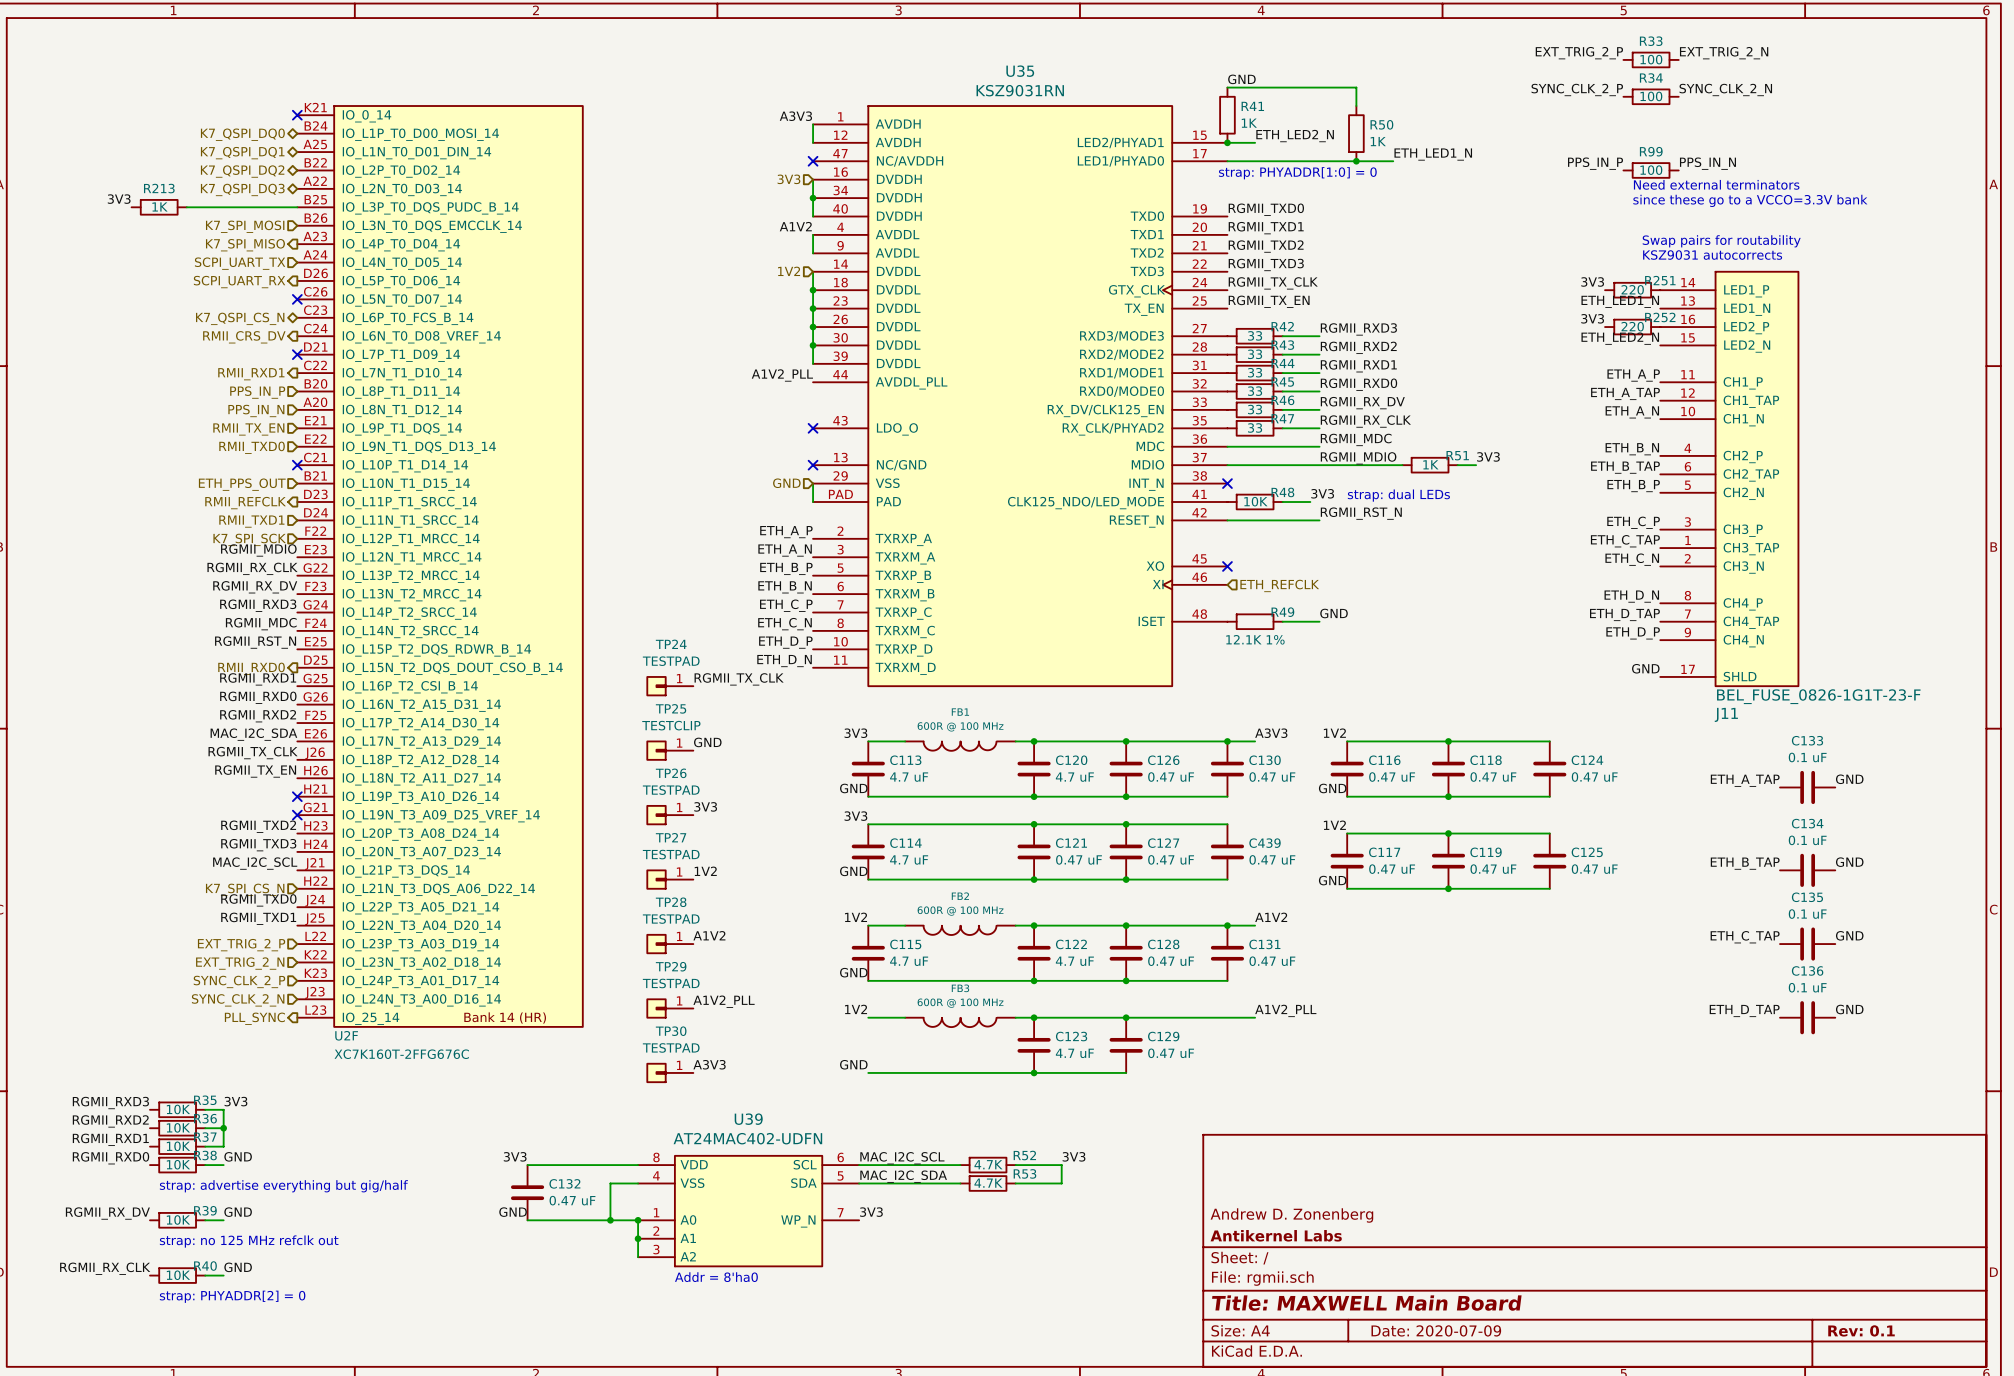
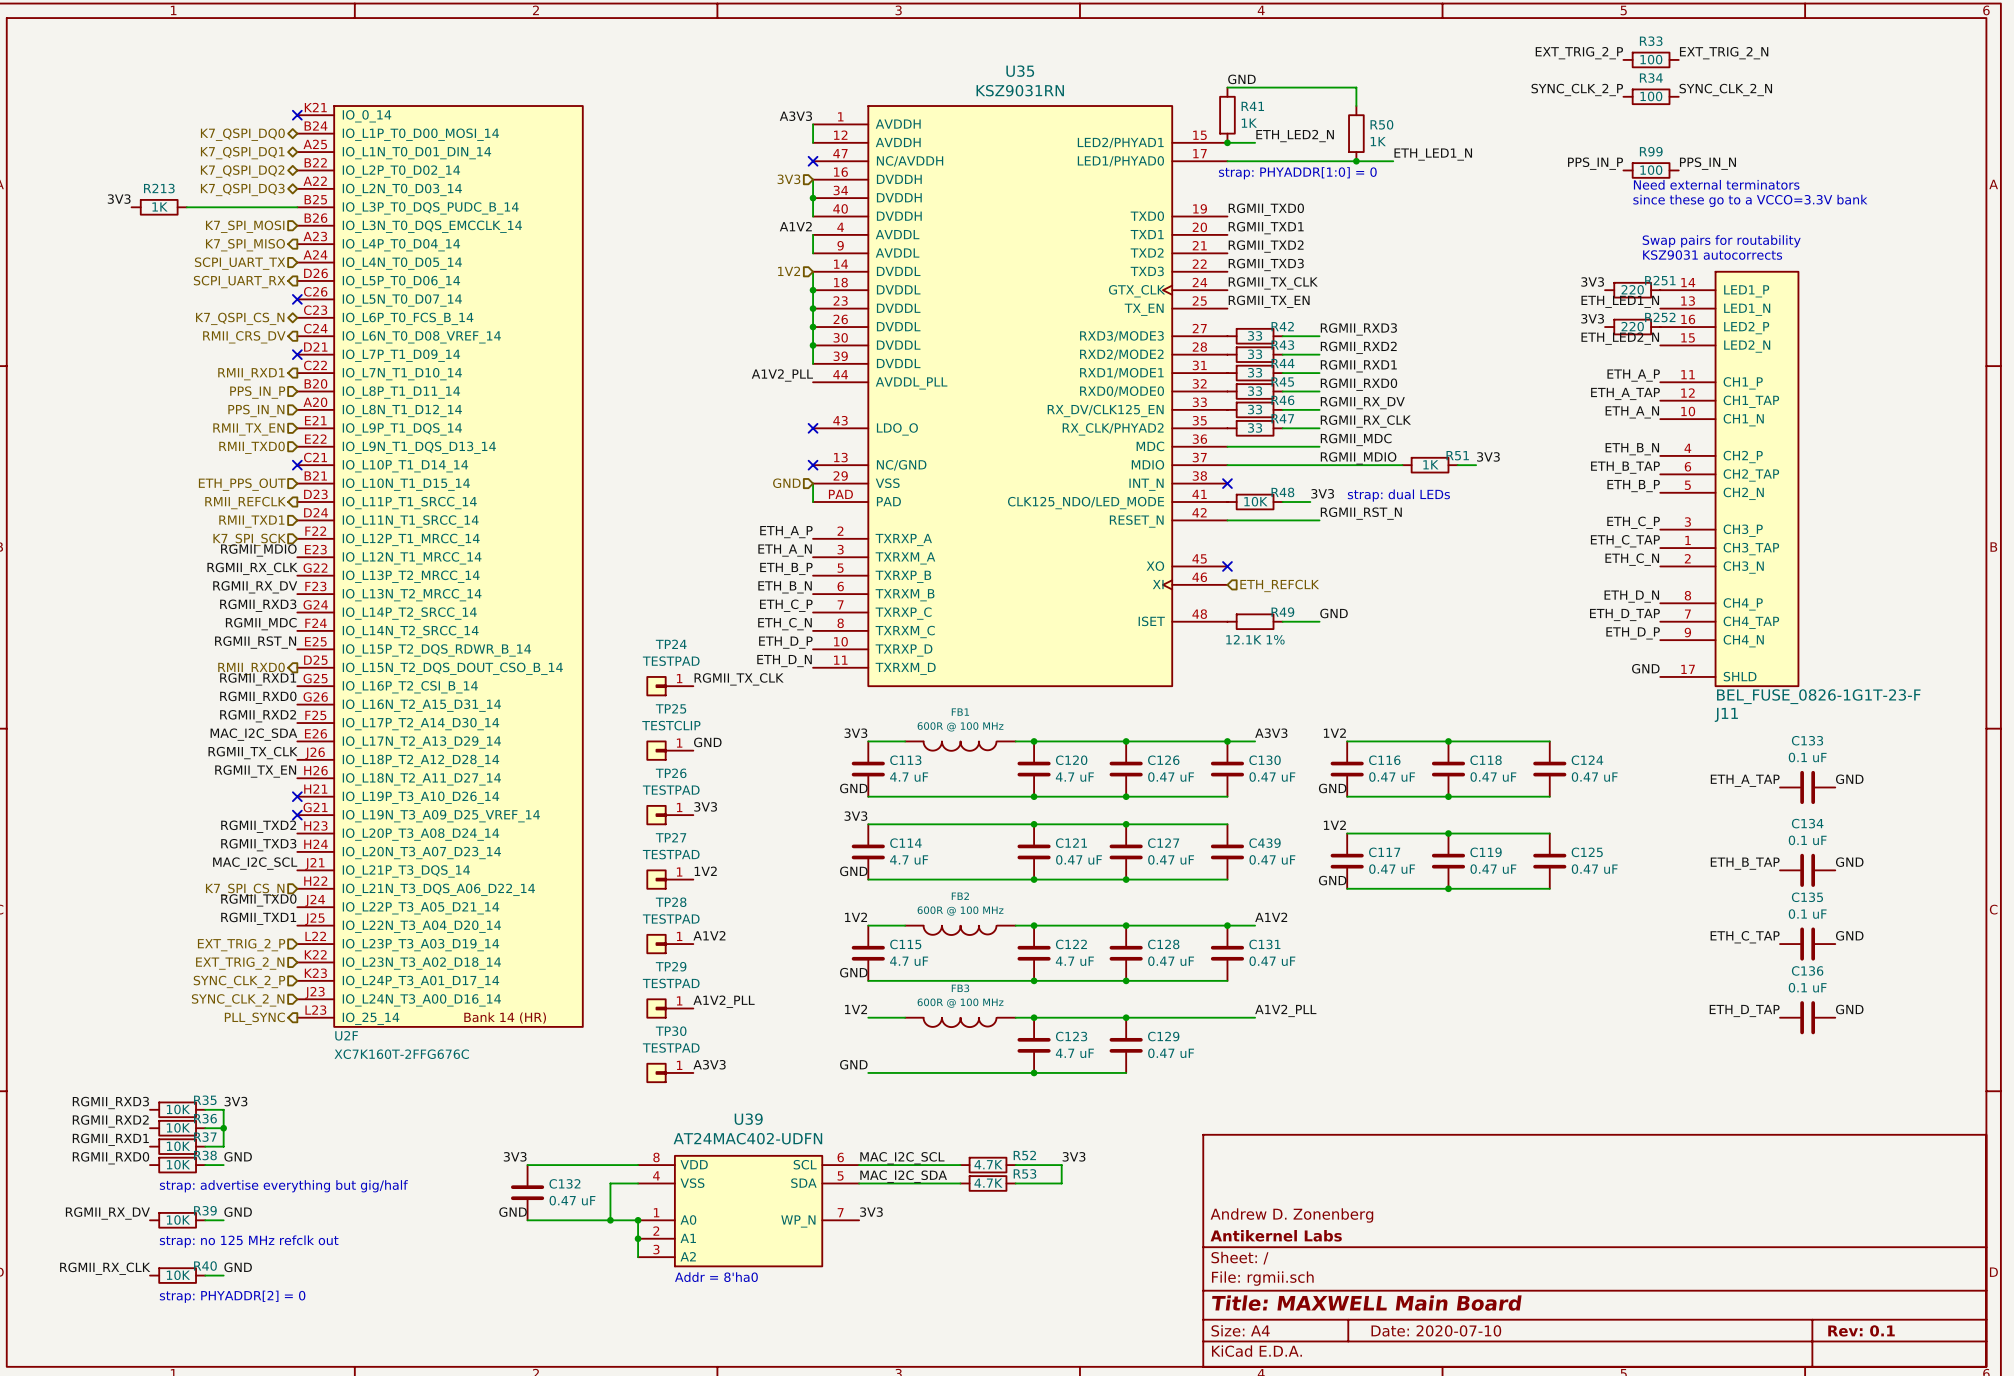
title block: Date: 2020-07-09 (1436, 1330) -> Date: 2020-07-10 (1436, 1330)

